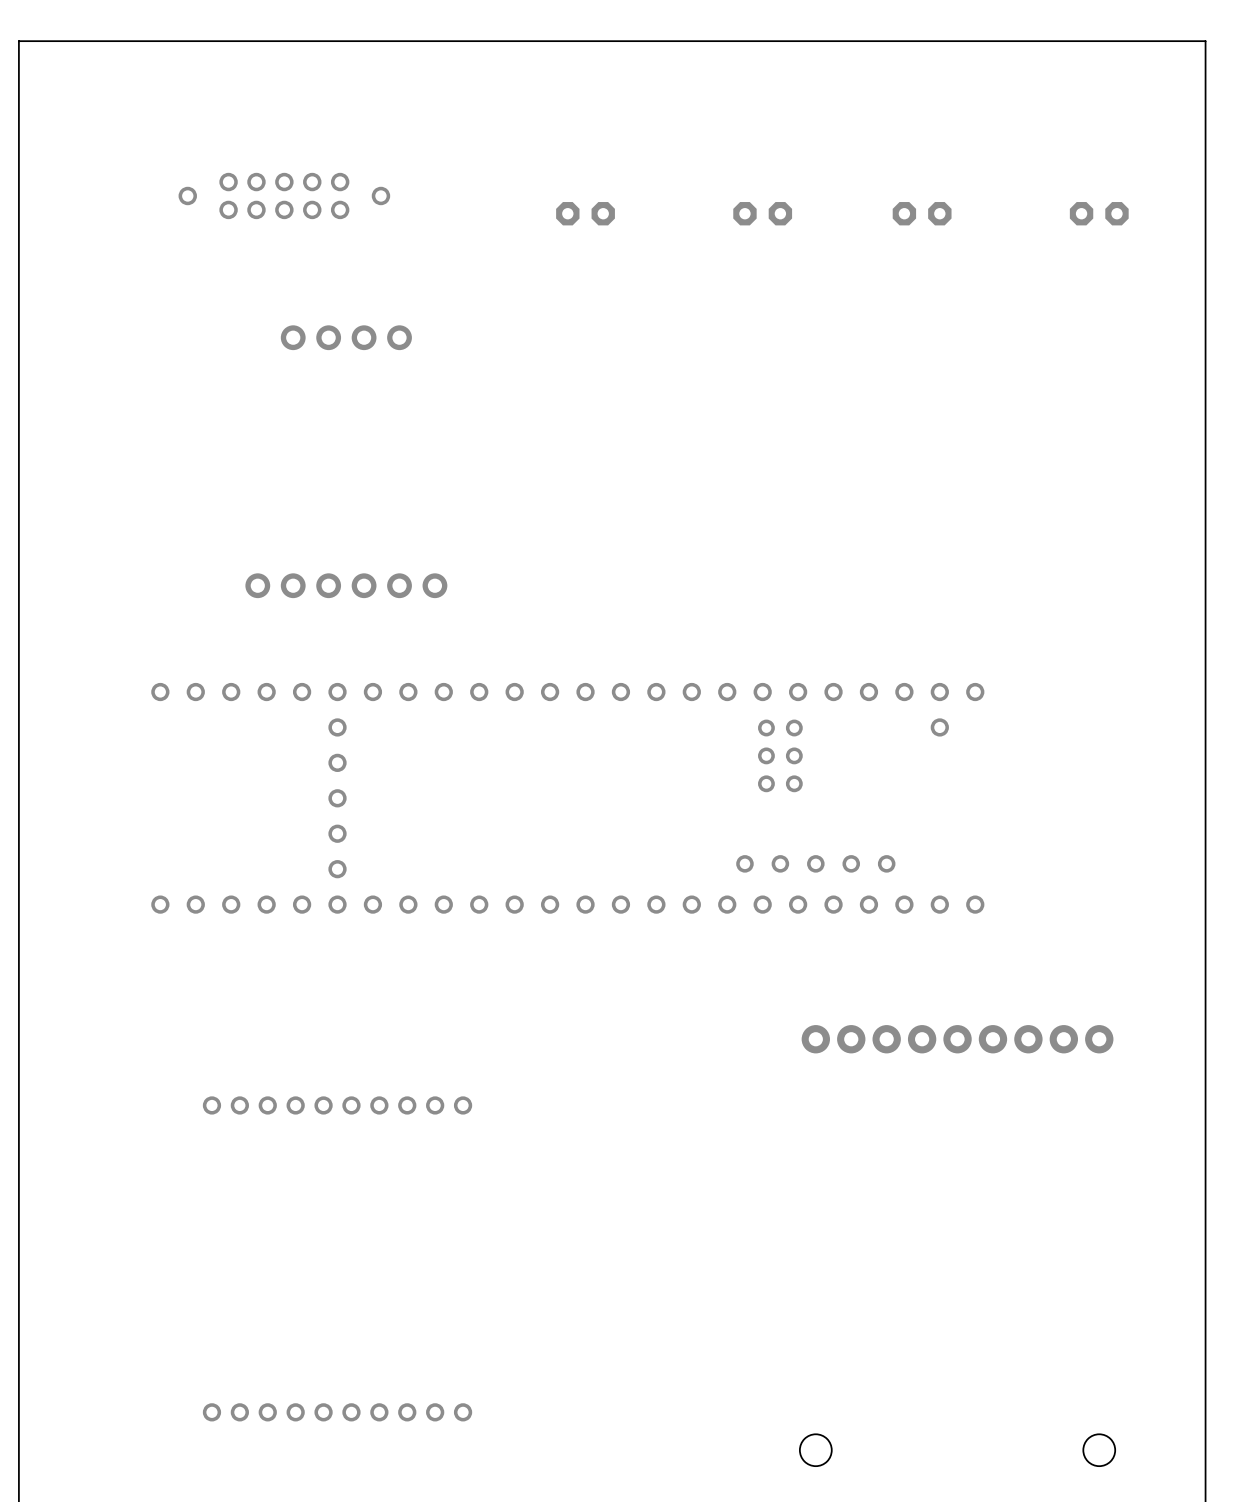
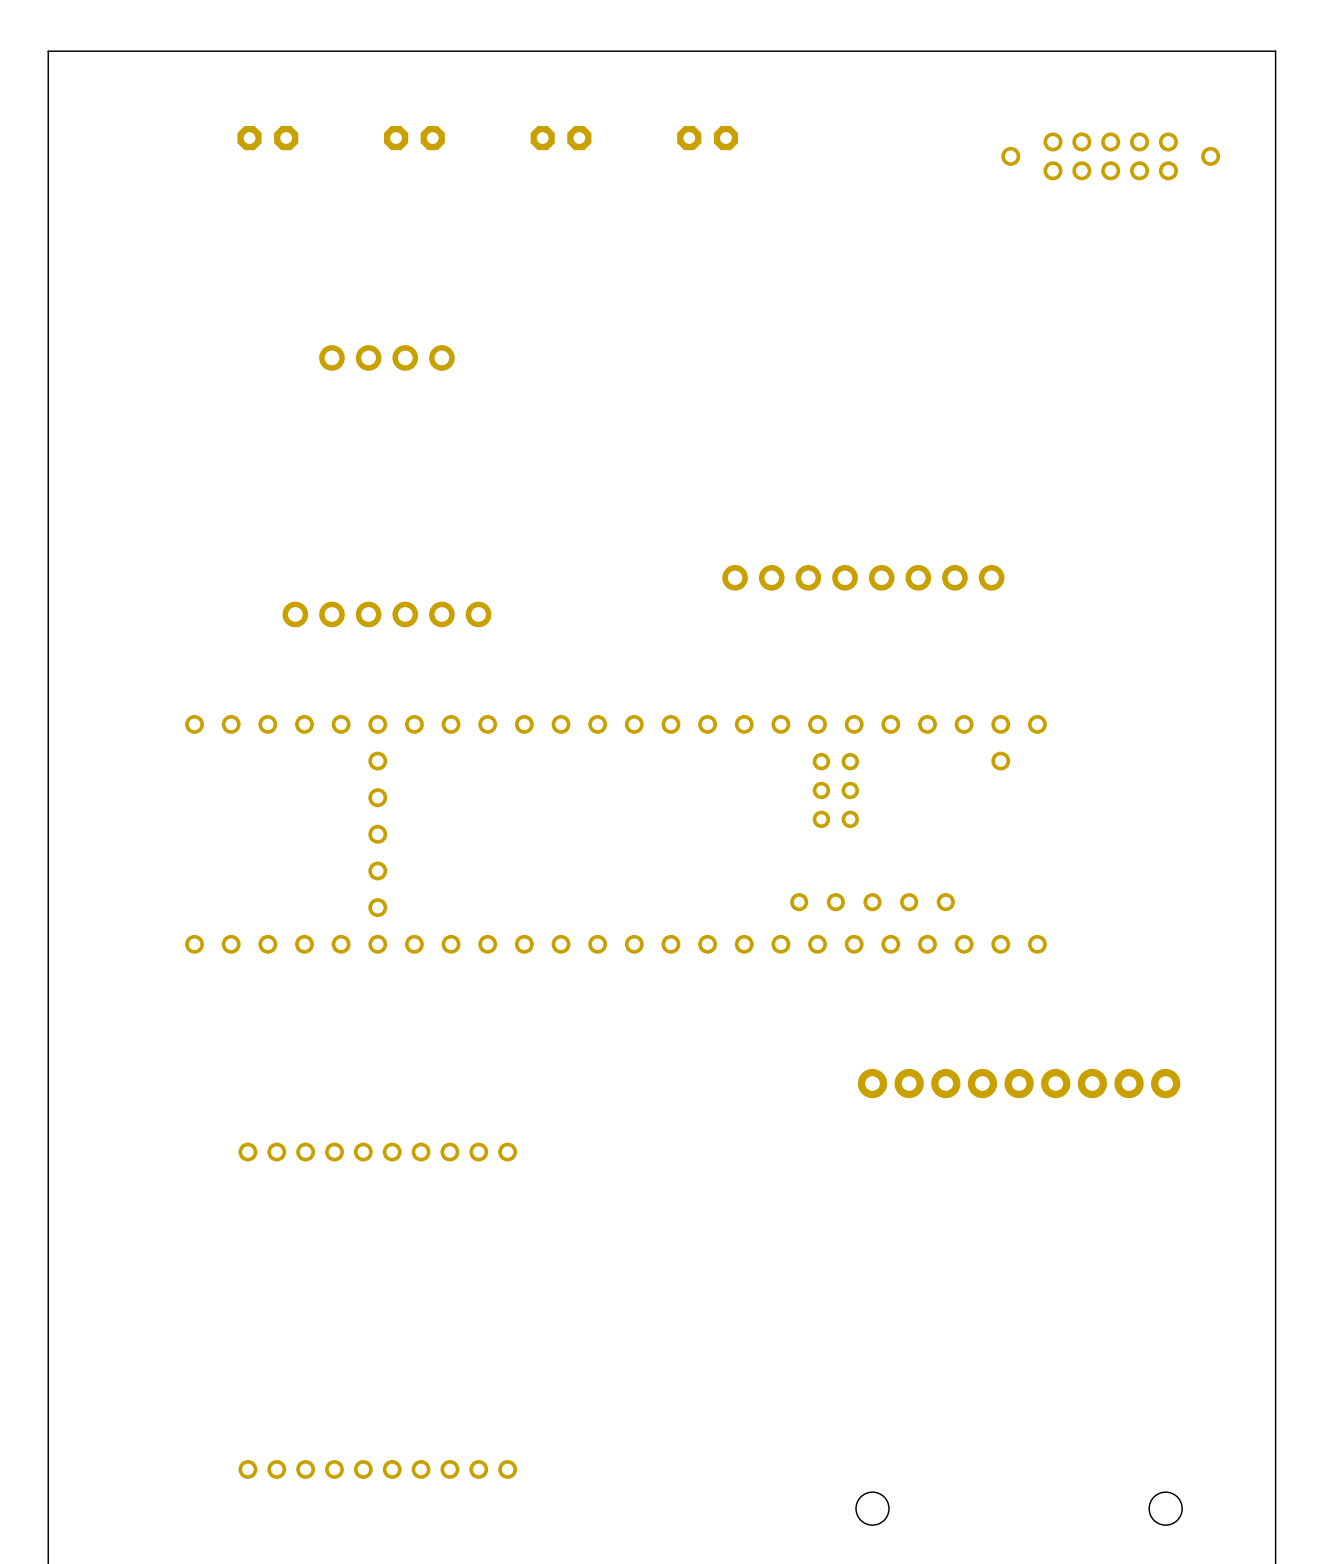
part: none -> (267, 138)
part: none -> (414, 138)
part: none -> (561, 138)
part: none -> (707, 138)
part: none -> (1110, 156)
part: (284, 195) -> none
part: (585, 213) -> none
part: (762, 213) -> none
part: (922, 213) -> none
part: (1099, 213) -> none
part: none -> (863, 577)

